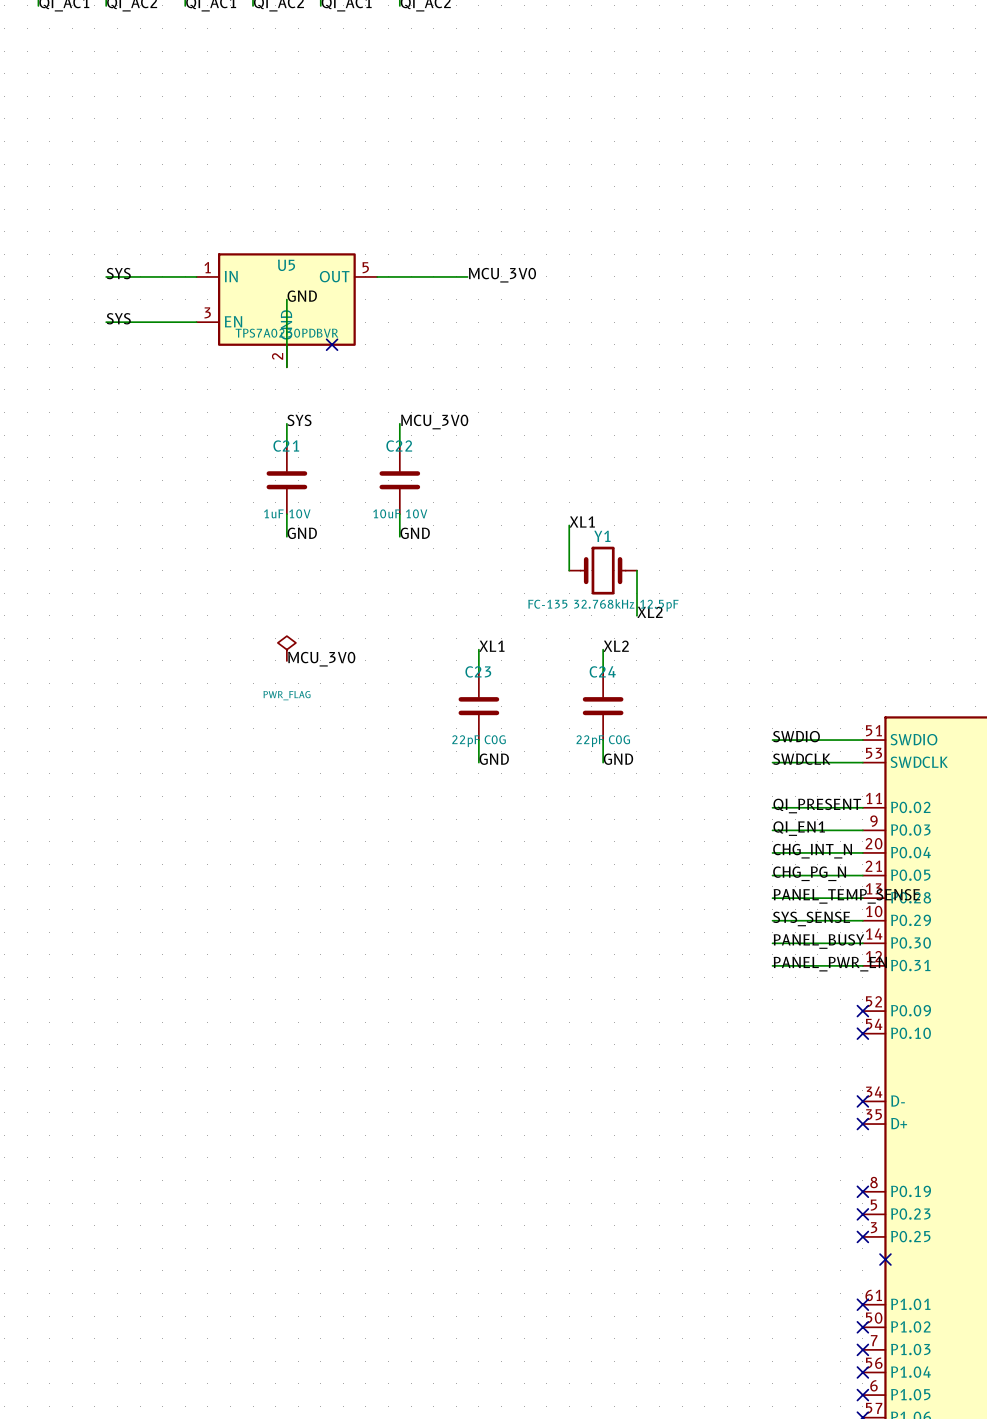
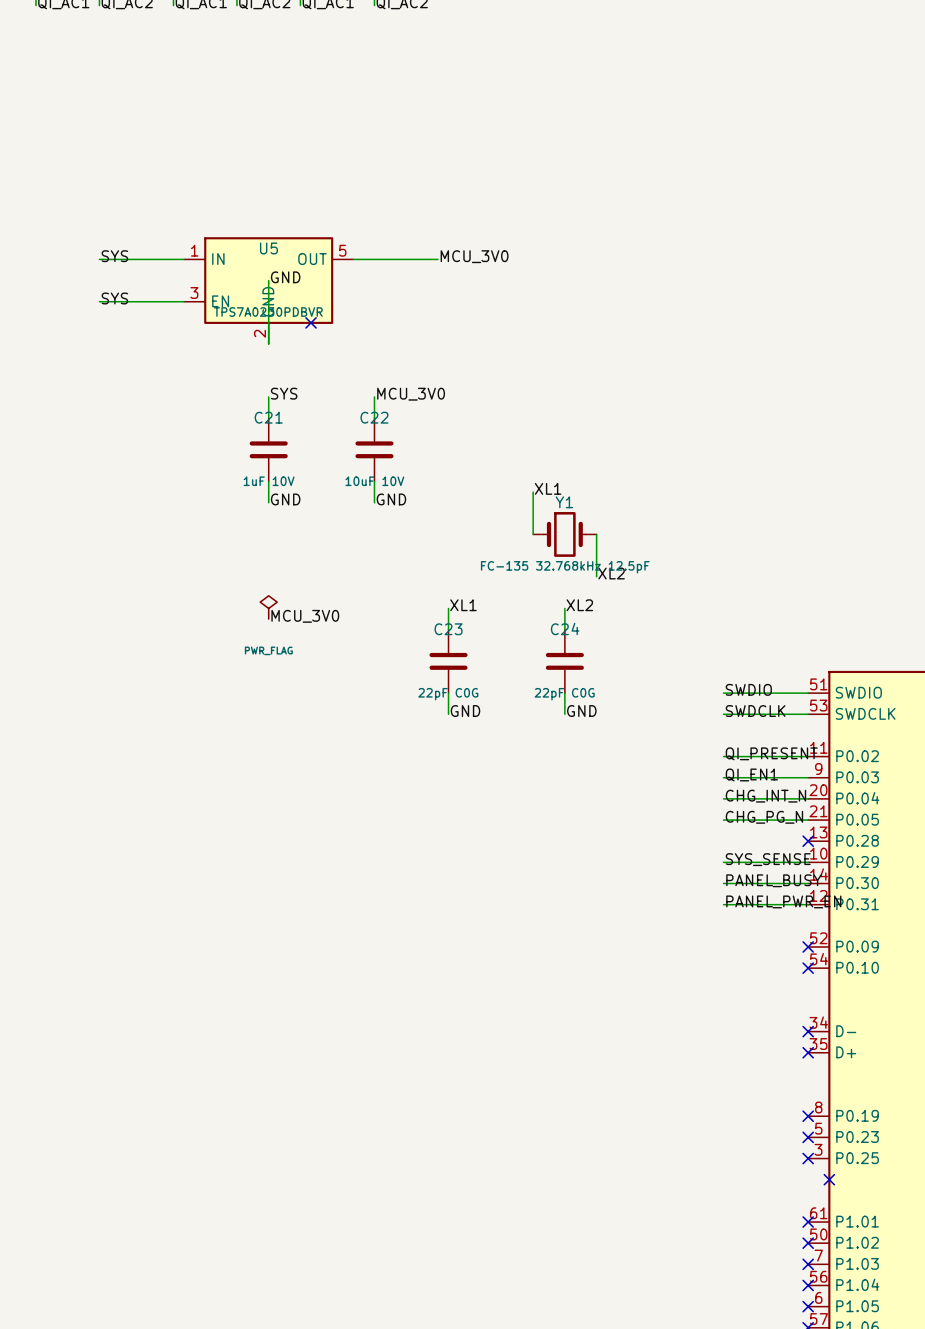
label: PANEL_TEMP_SENSE (846, 896) -> none
wire: (772, 898) (862, 898) -> none
no-connect mark: none -> (808, 841)

